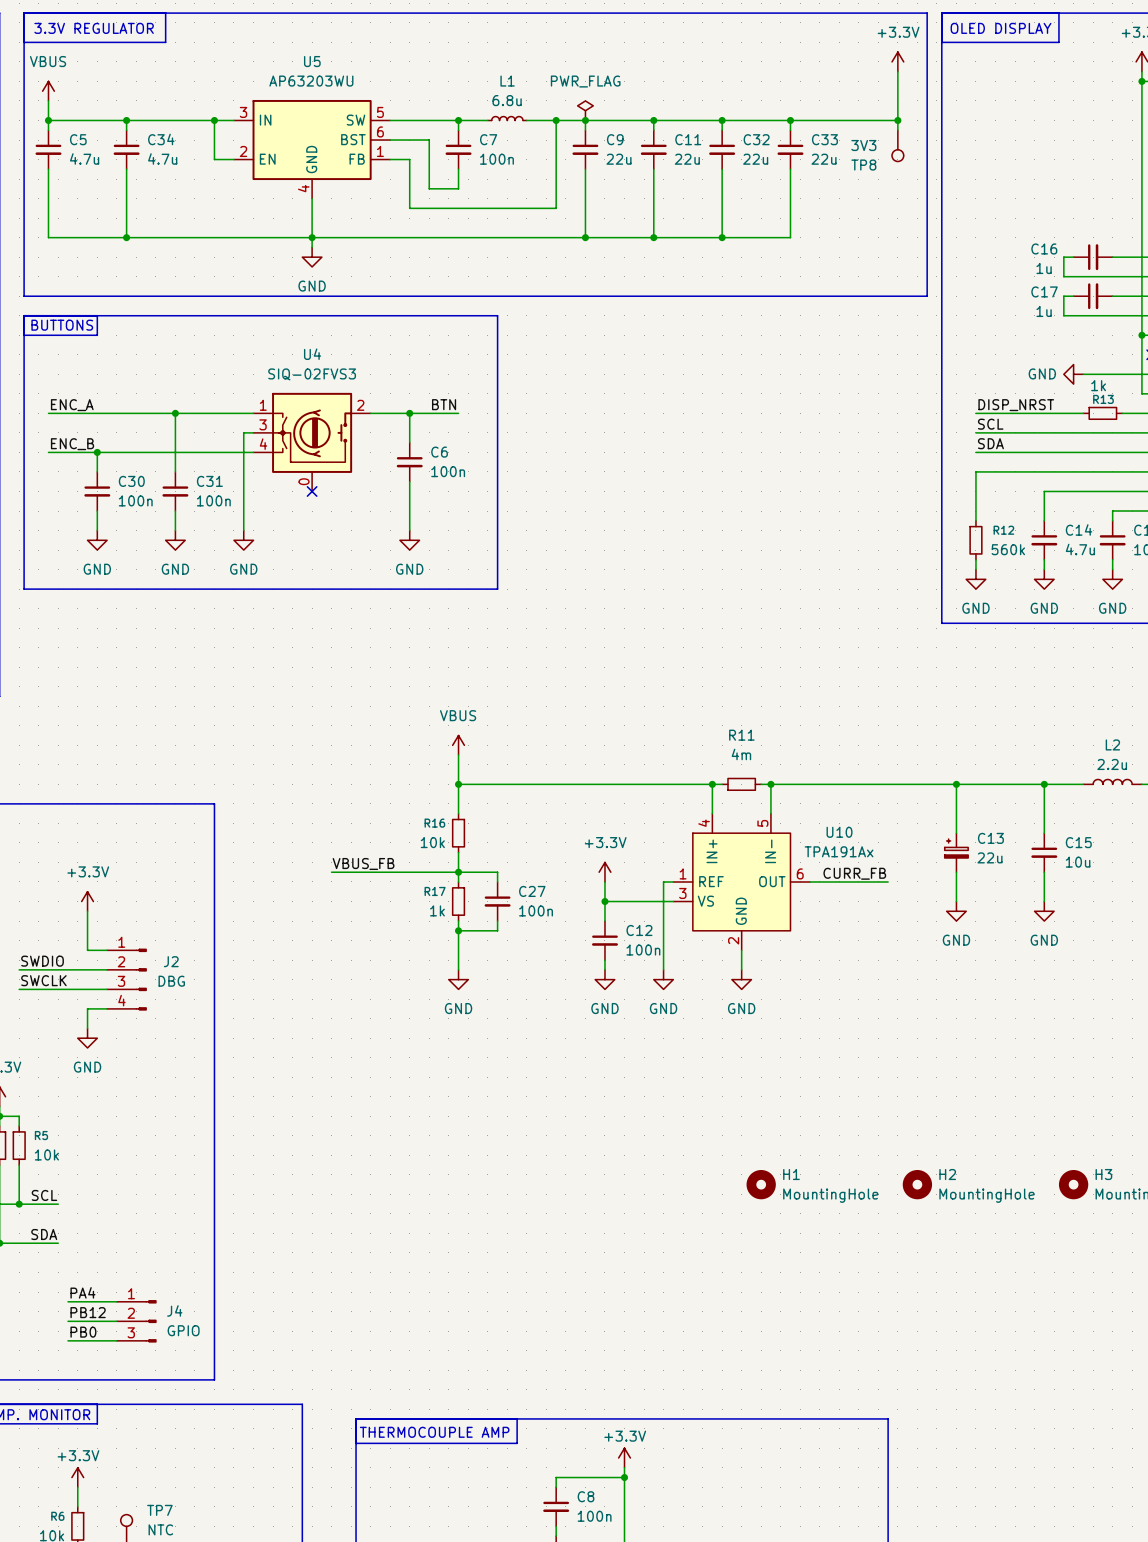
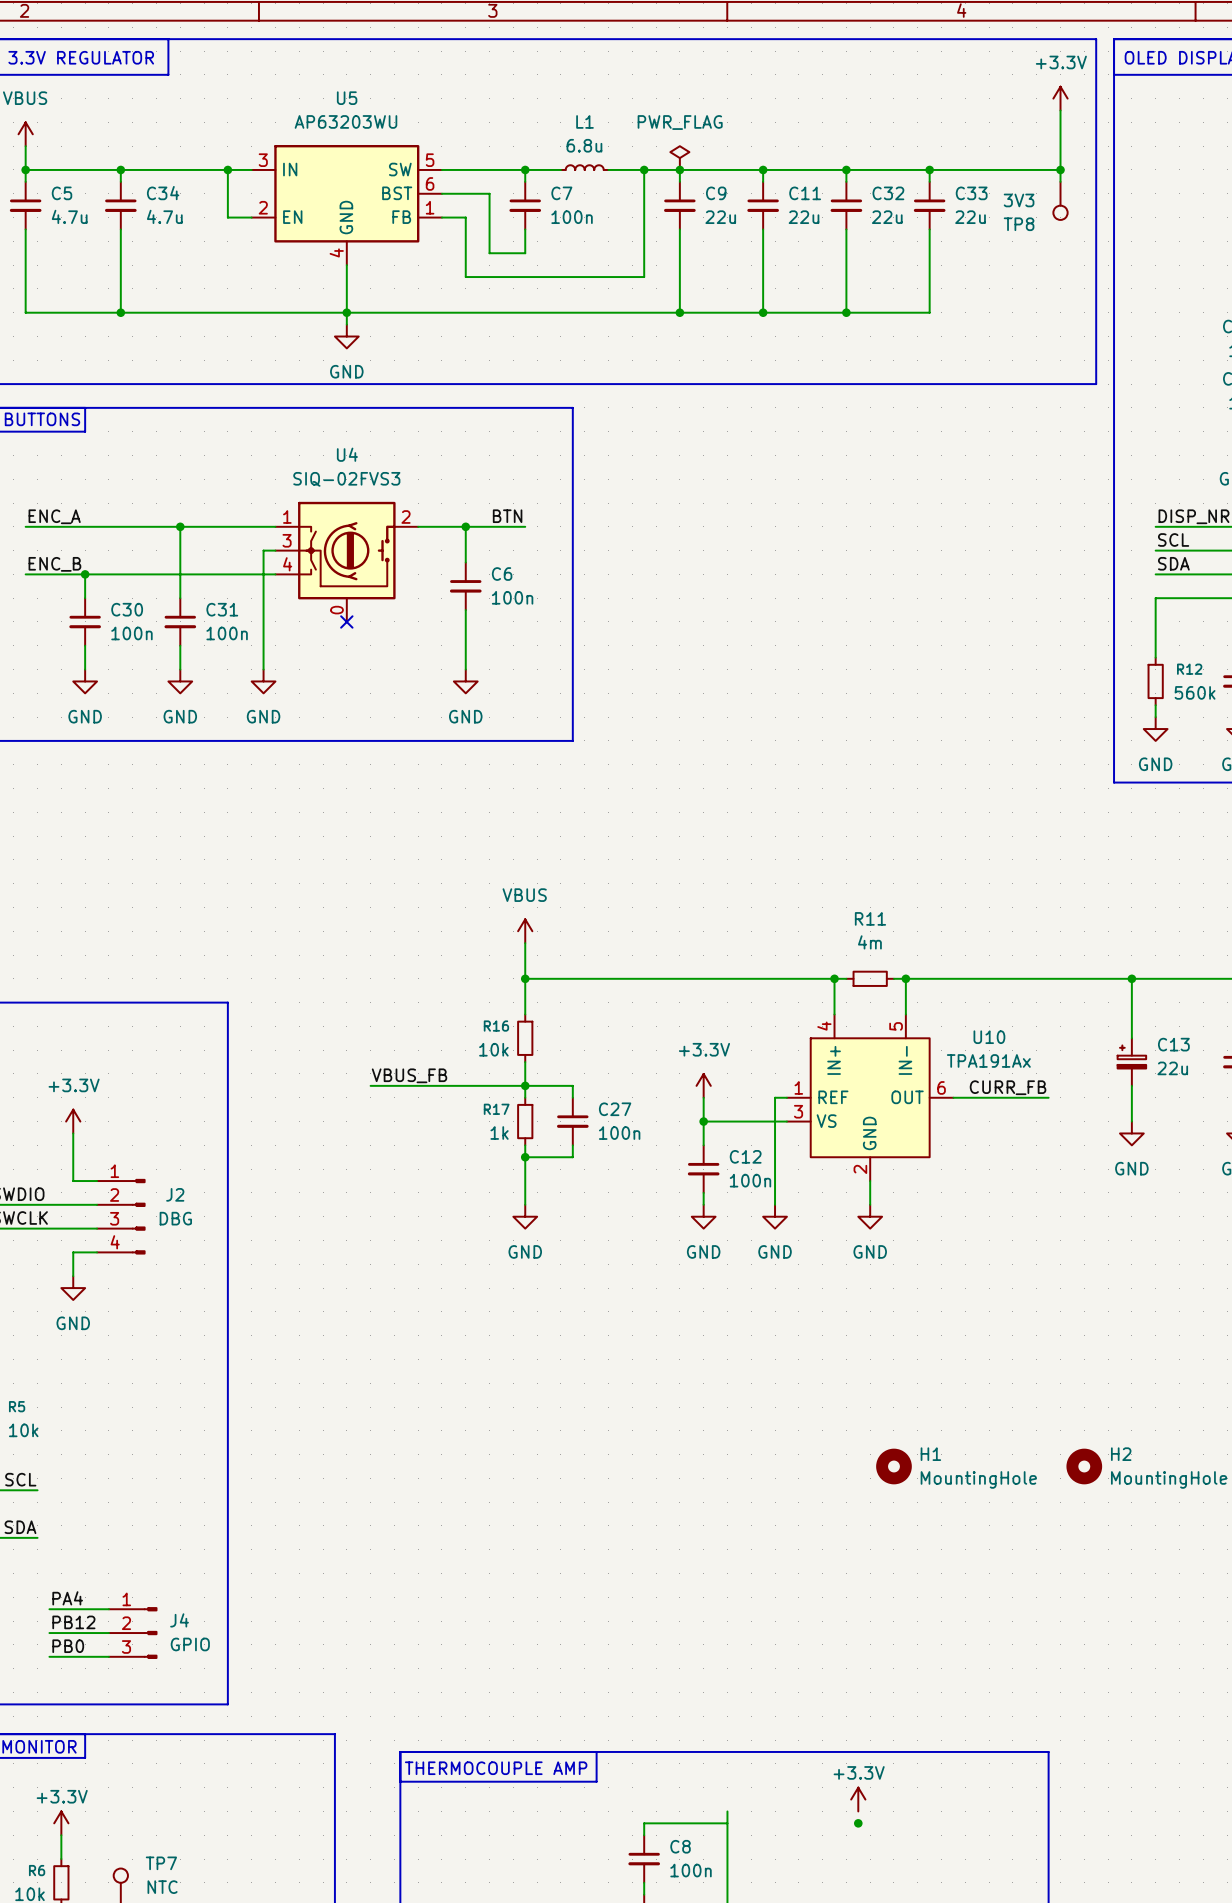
power symbol position: +3.3V (624, 1458) -> +3.3V (858, 1799)
junction: (624, 1477) -> none
junction: none -> (858, 1823)

